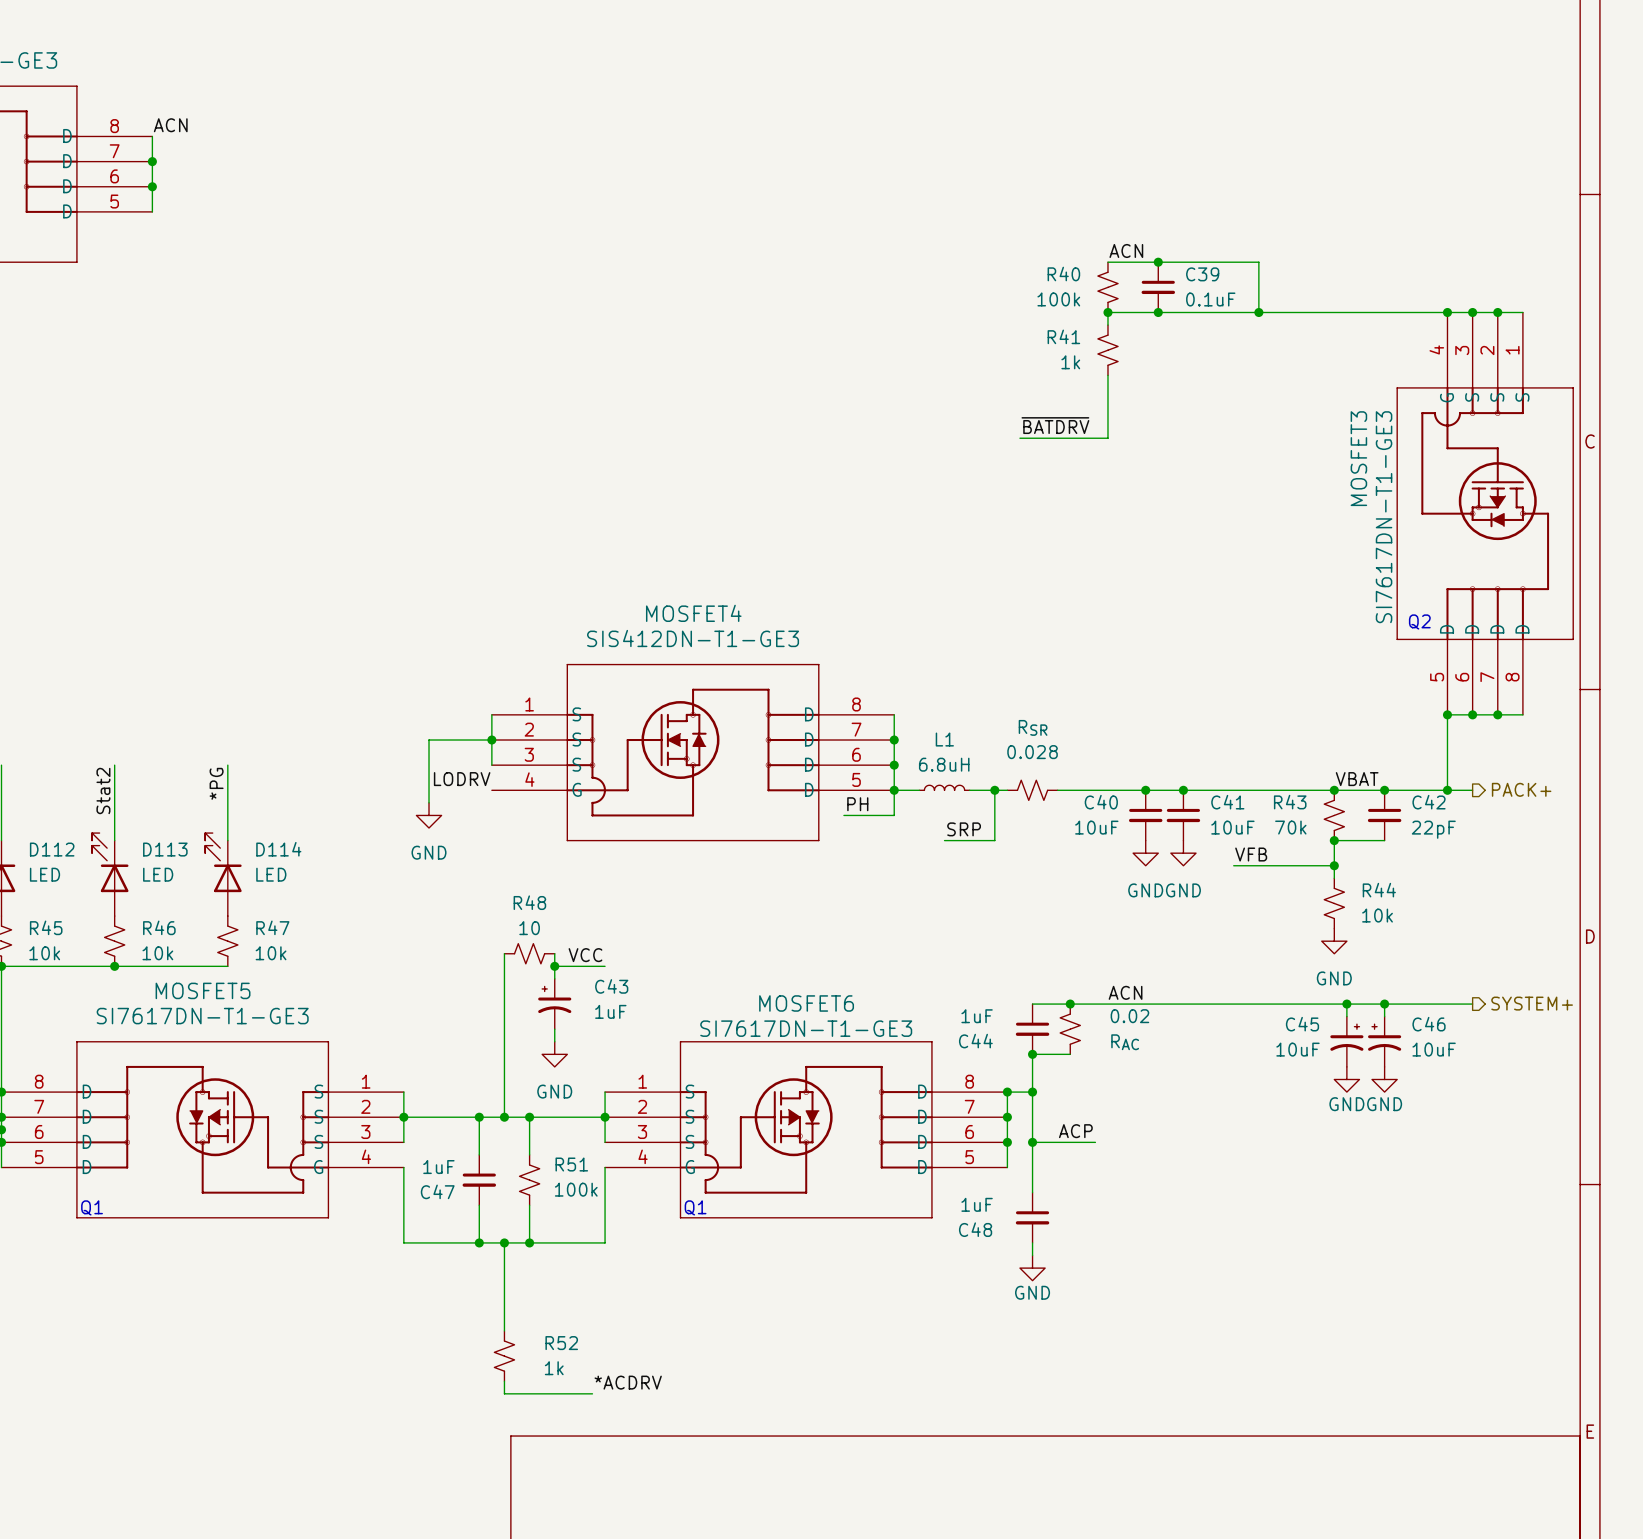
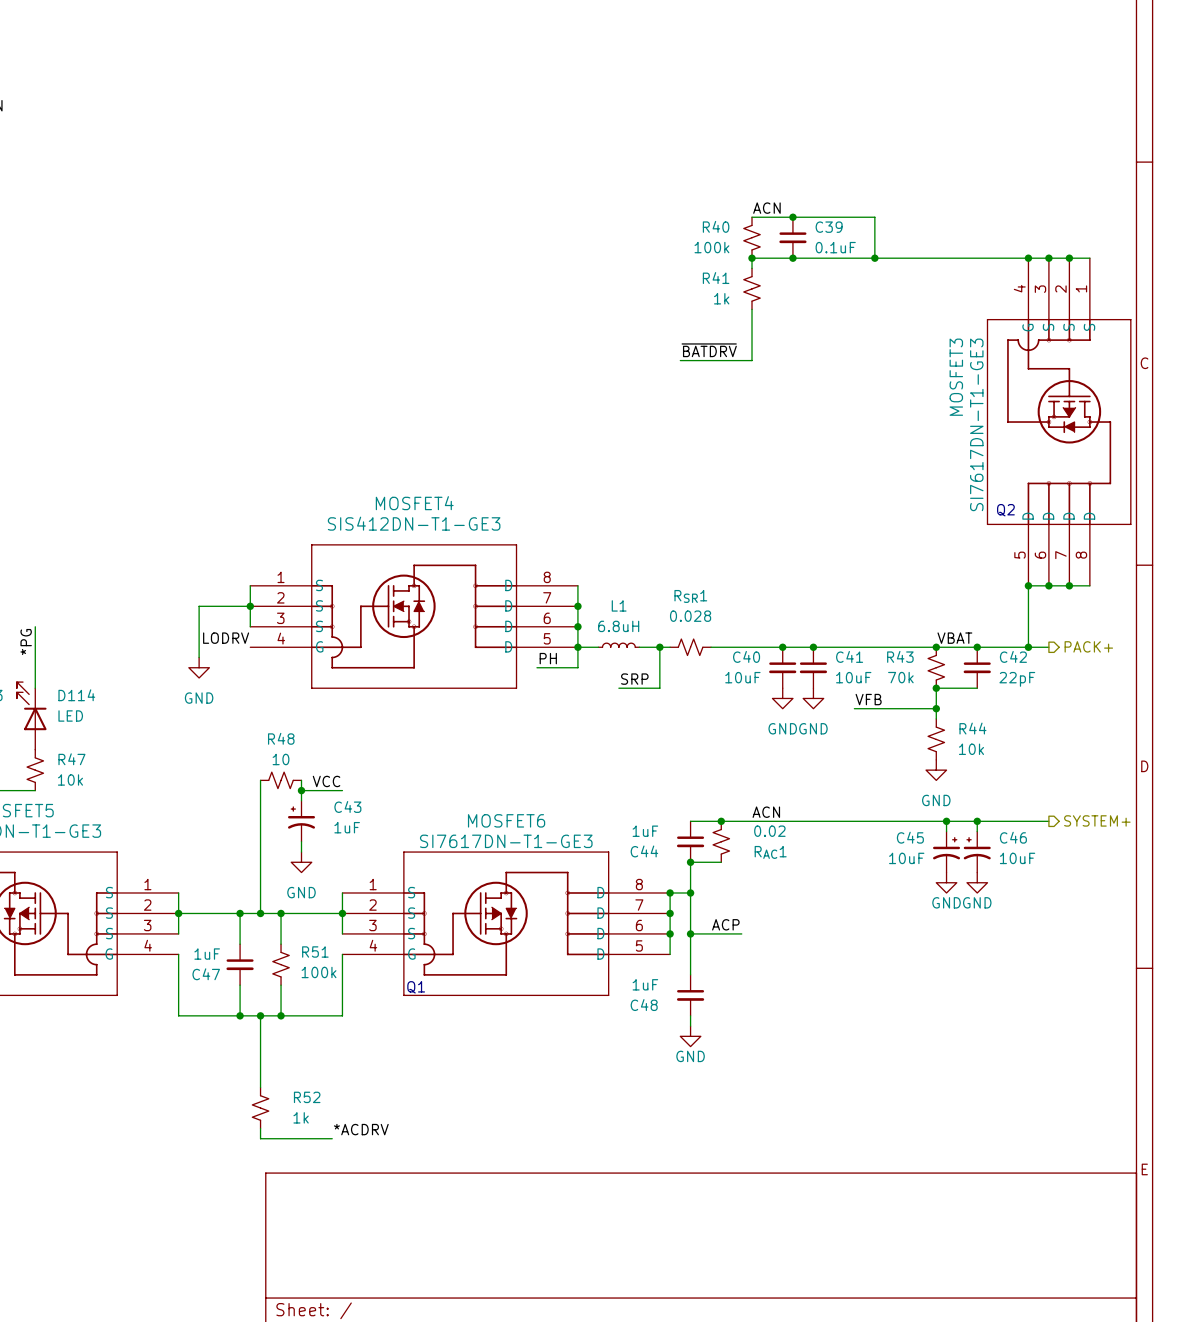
RSR name: RSR (1033, 727) -> RSR1 (690, 596)
RAC name: RAC (1125, 1042) -> RAC1 (770, 852)

